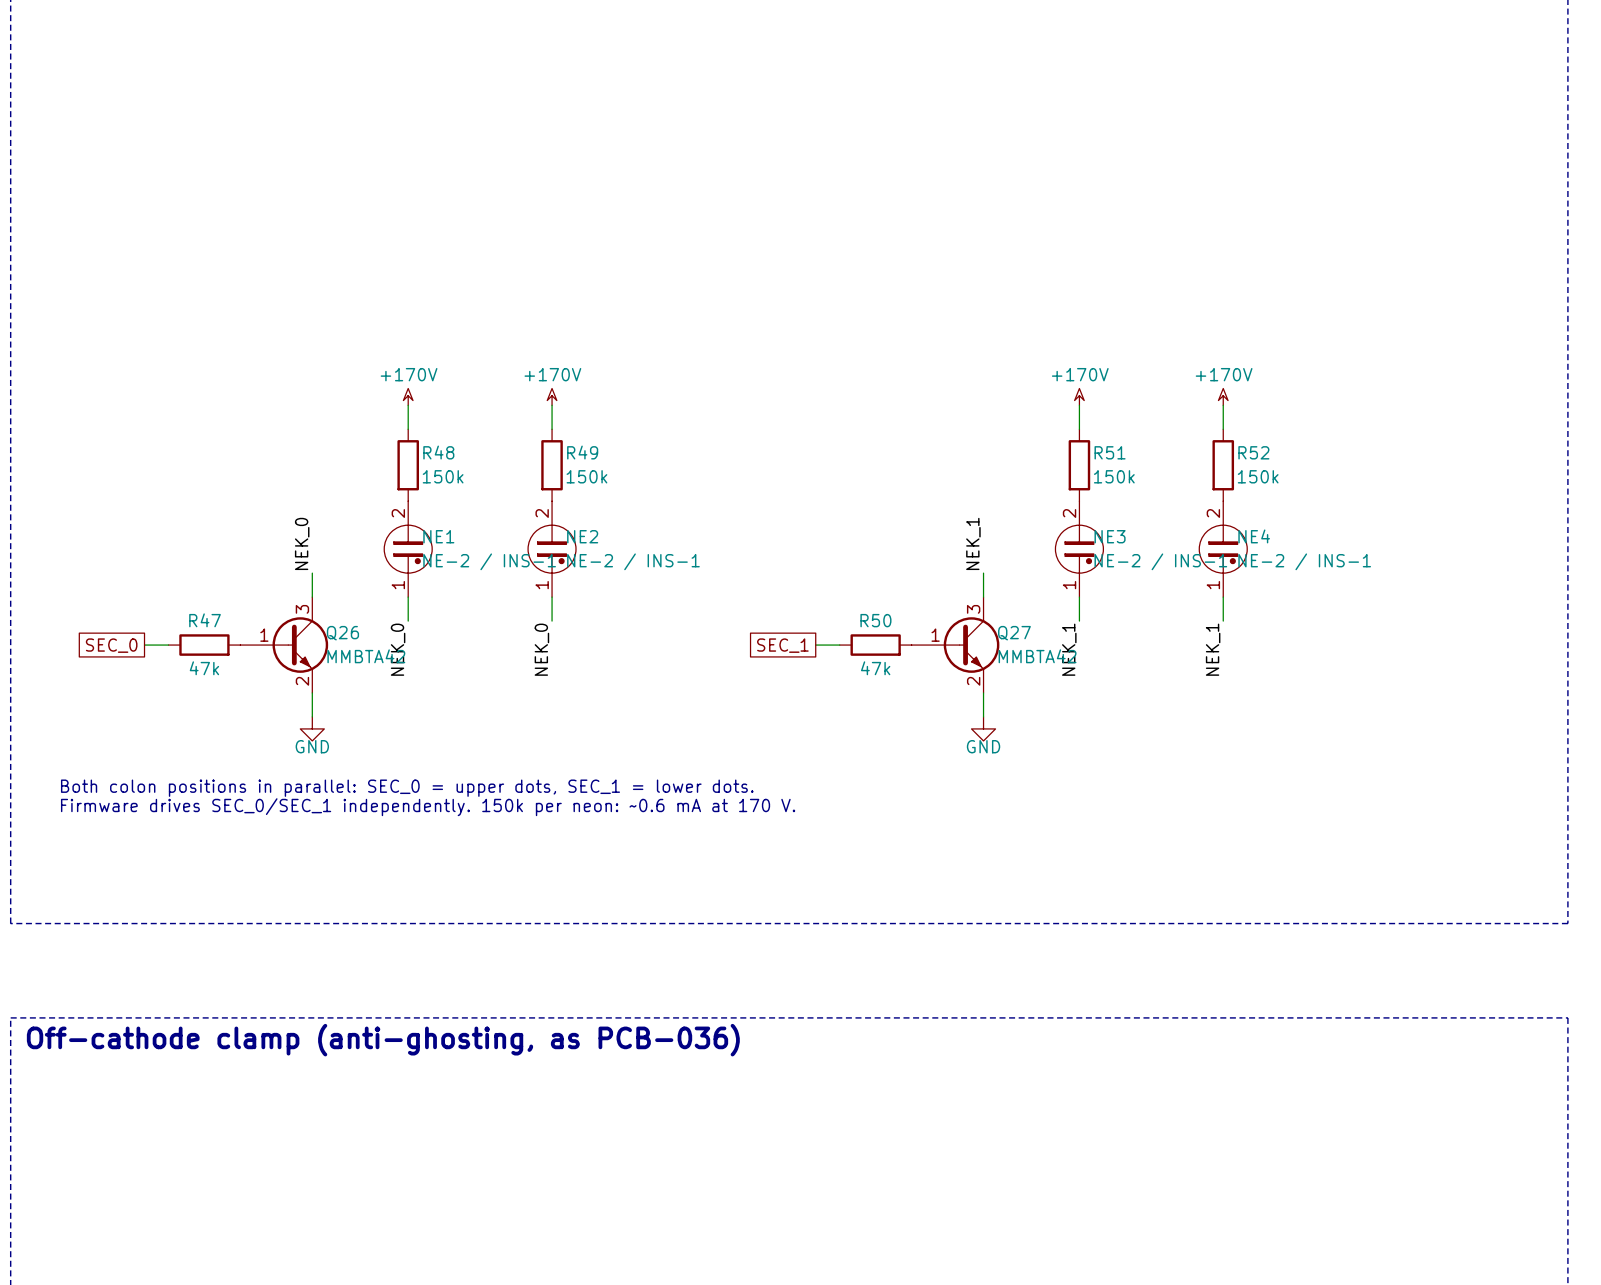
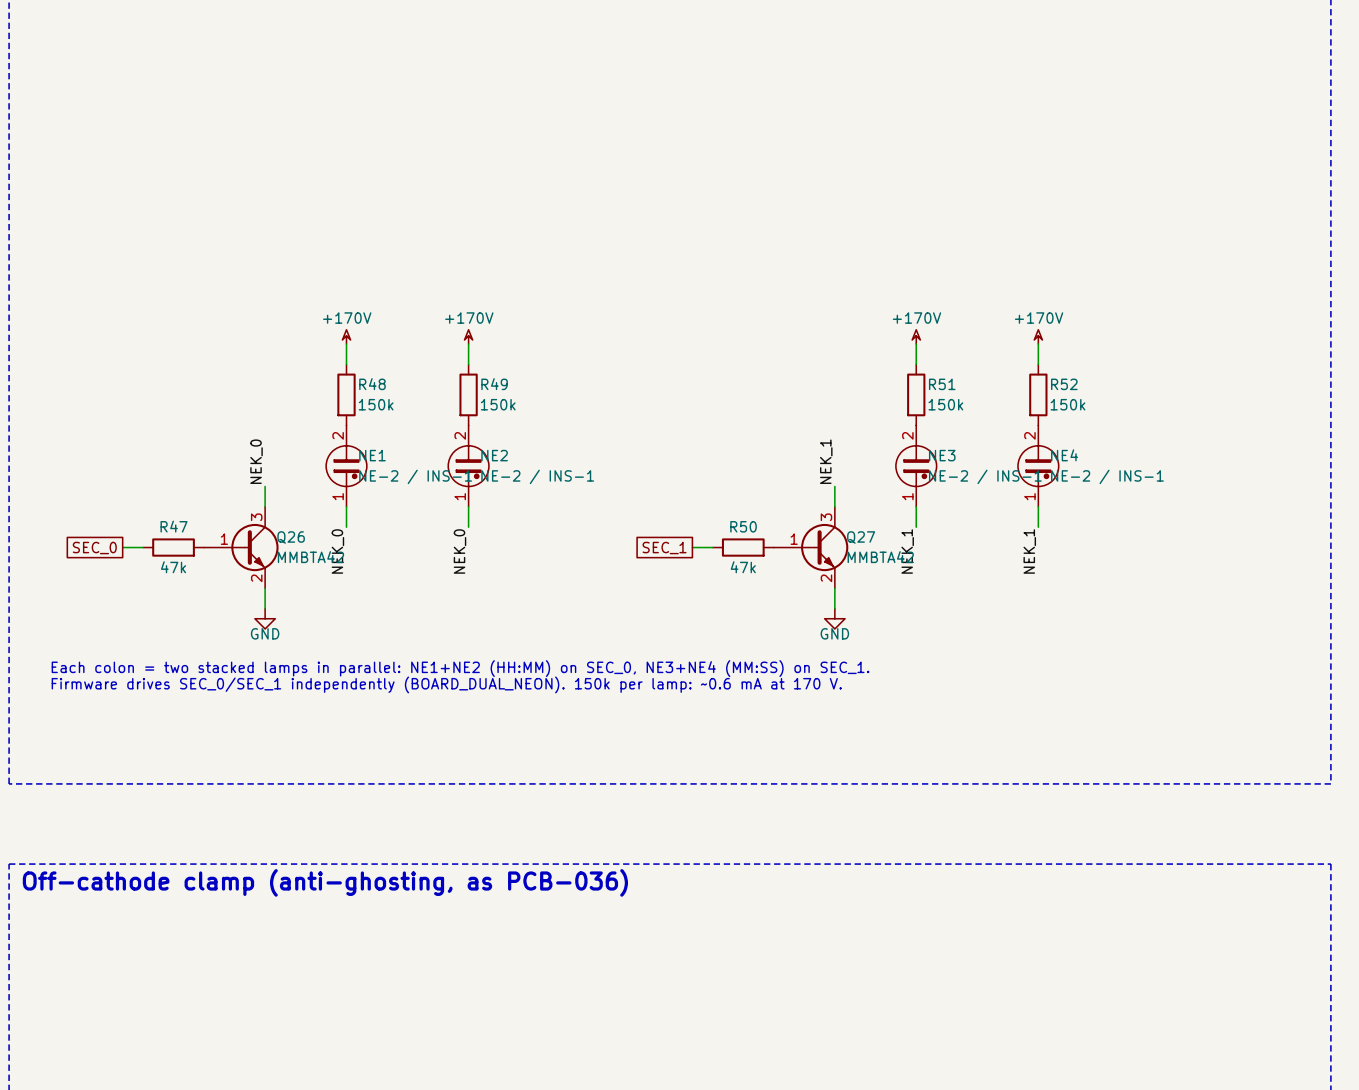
text: Both colon positions in parallel: SEC_0 = upper dots, SEC_1 = lower dots. (407, 788) -> Each colon = two stacked lamps in parallel: NE1+NE2 (HH:MM) on SEC_0, NE3+NE4 (MM:SS) on SEC_1. (460, 668)
text: Firmware drives SEC_0/SEC_1 independently. 150k per neon: ~0.6 mA at 170 V. (428, 807) -> Firmware drives SEC_0/SEC_1 independently (BOARD_DUAL_NEON). 150k per lamp: ~0.6 mA at 170 V. (446, 684)

